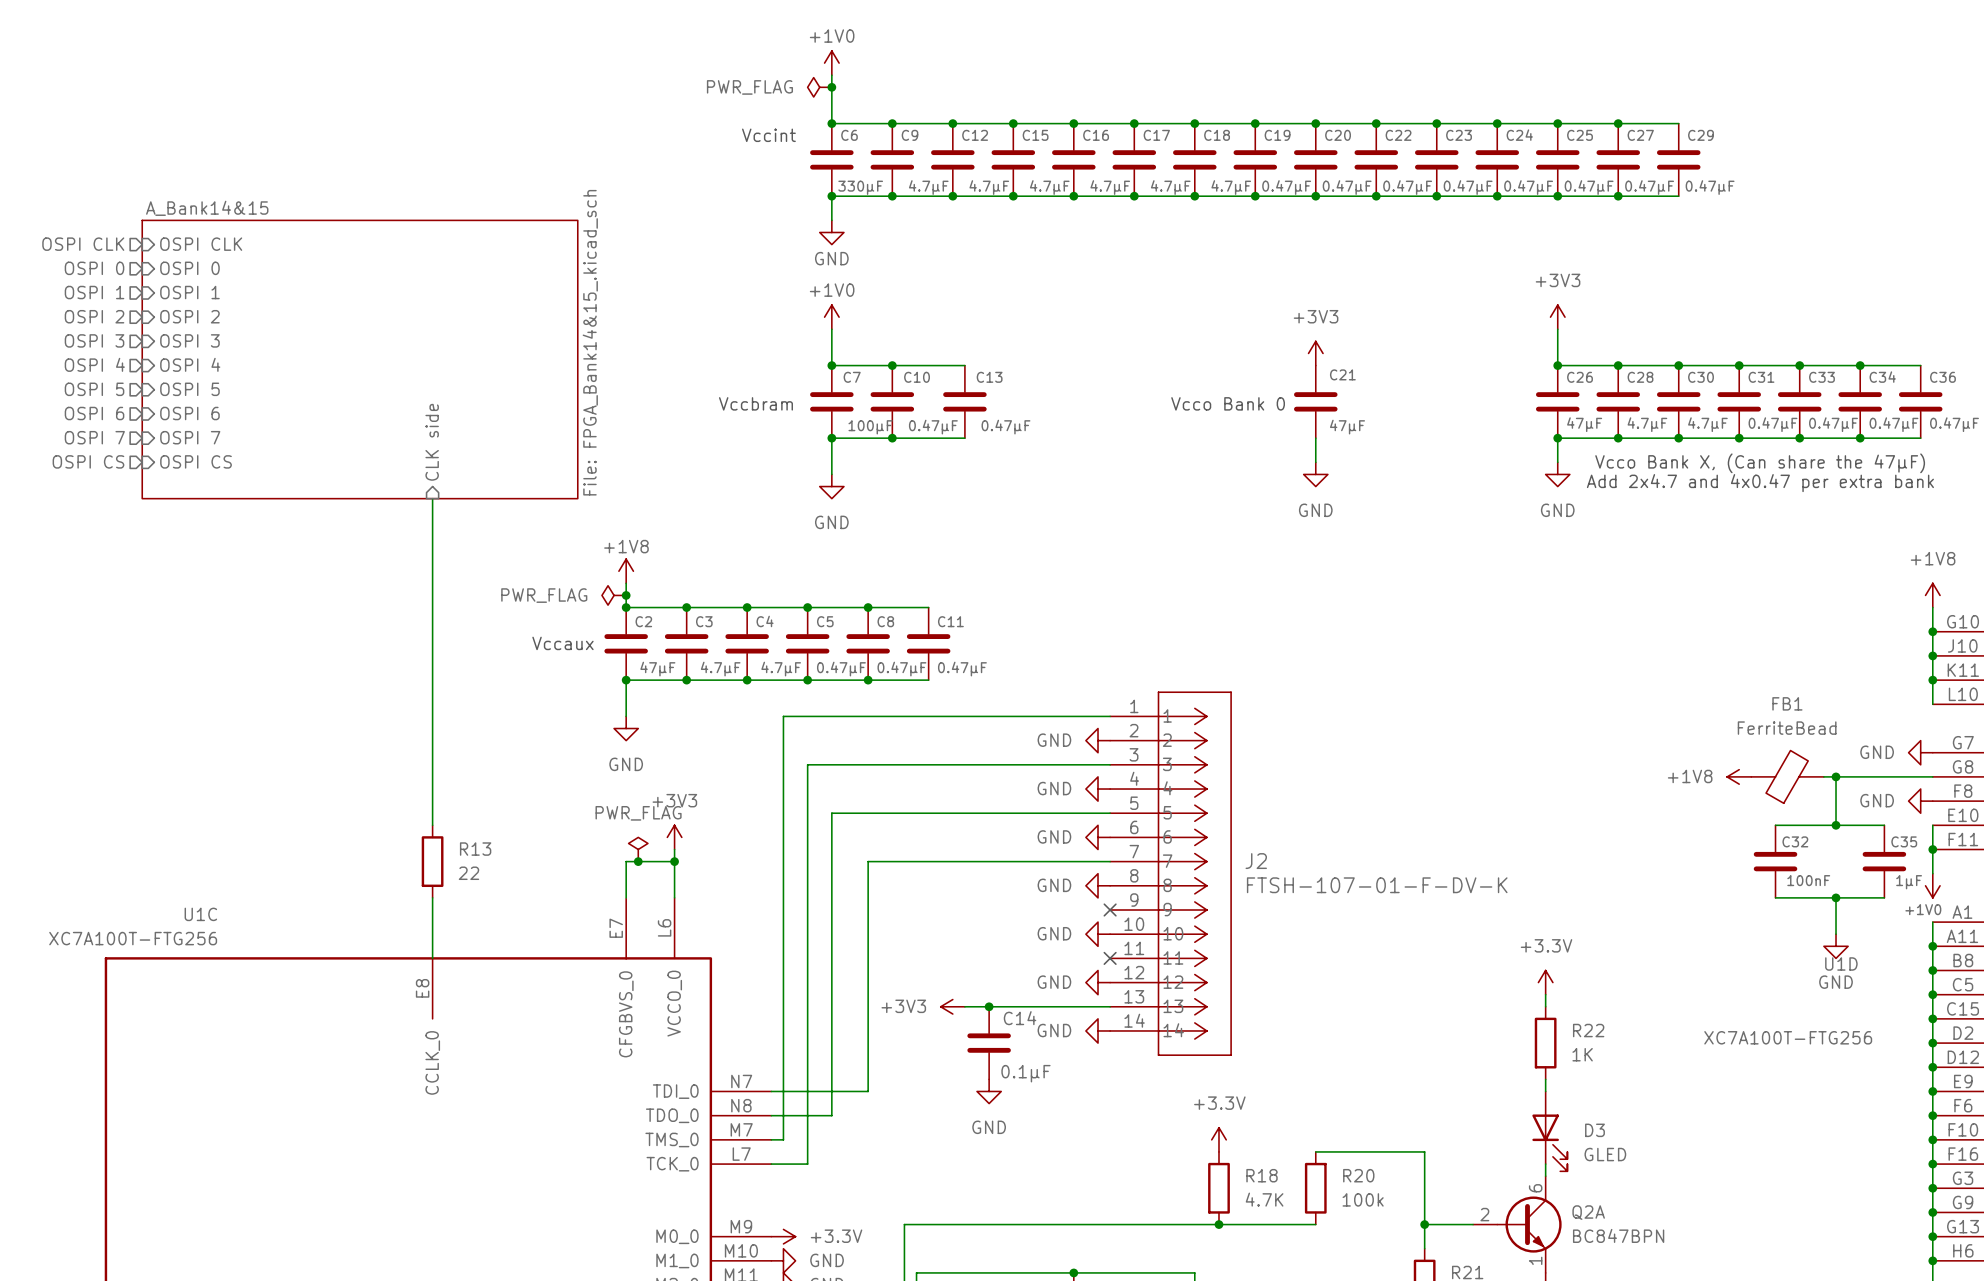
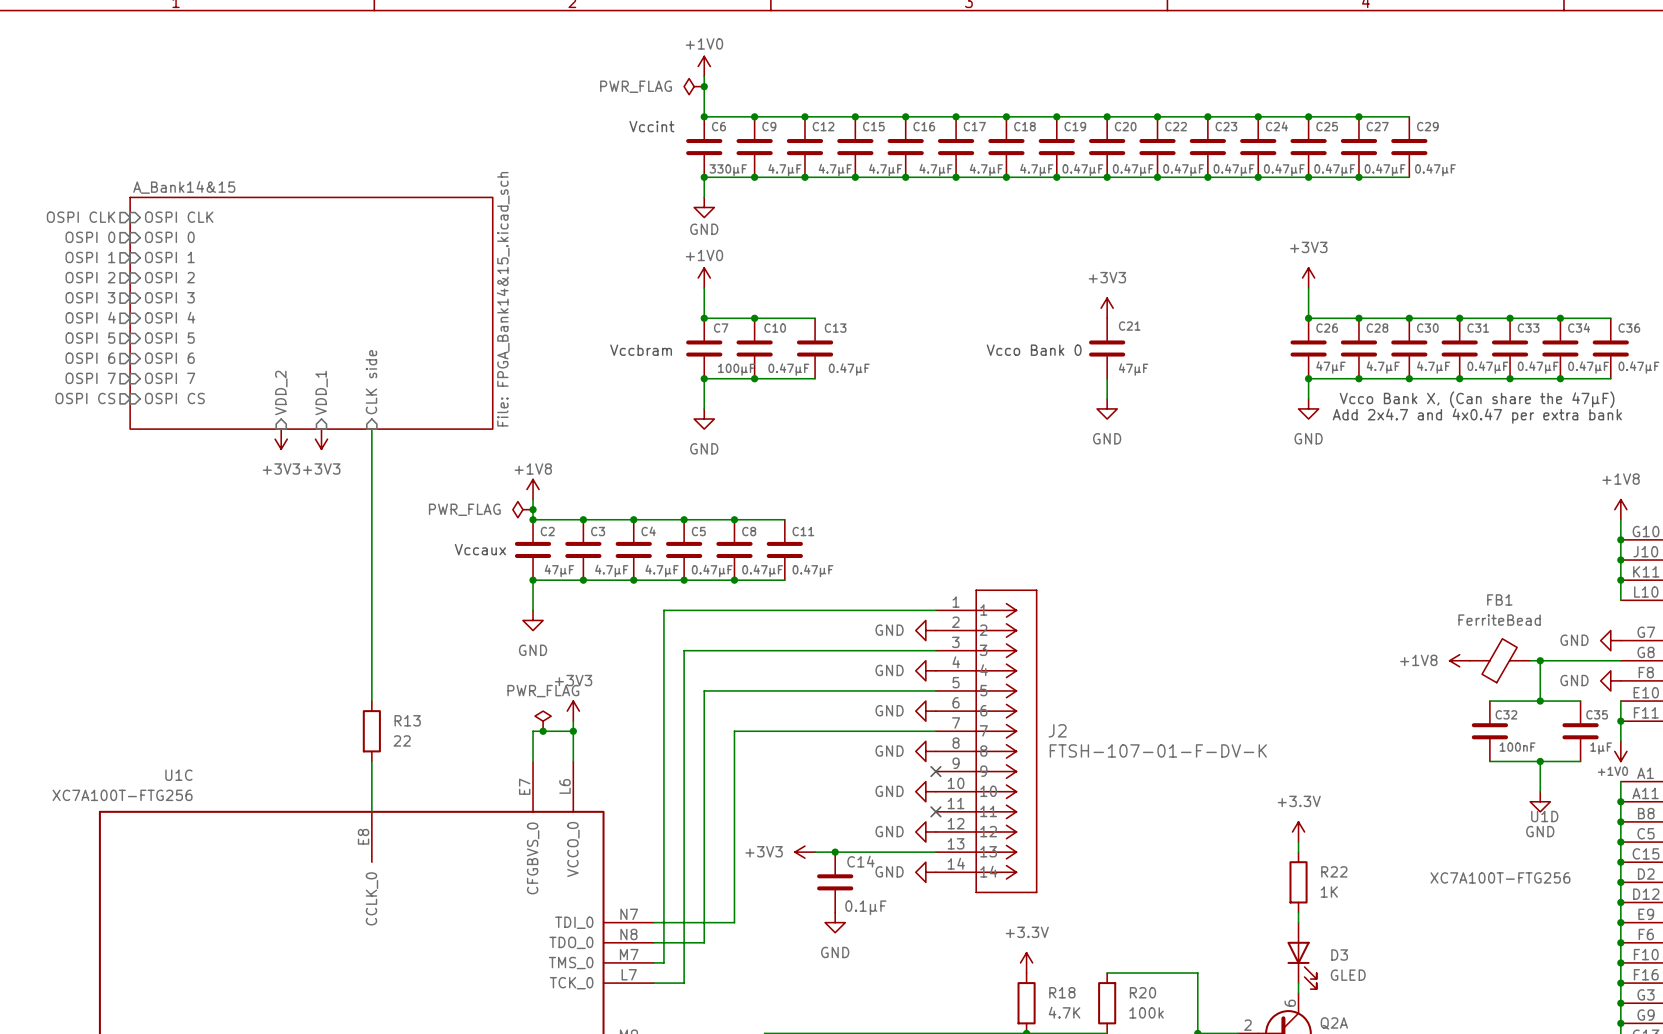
sheet pin: none -> VDD_2 (281, 392)
sheet pin: none -> VDD_1 (321, 392)
power symbol: none -> +3V3 (281, 439)
power symbol: none -> +3V3 (321, 439)

